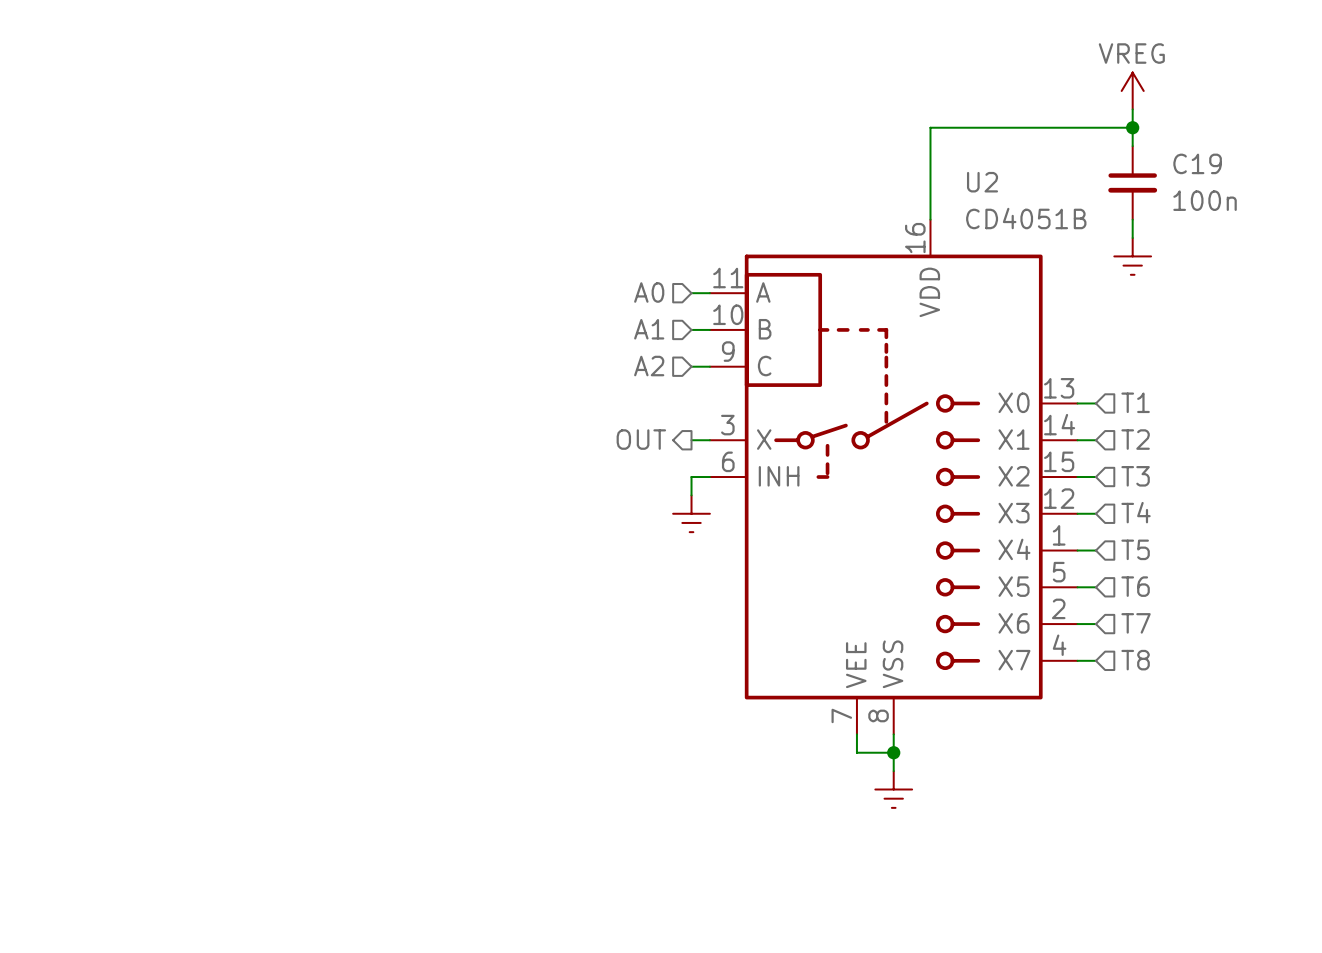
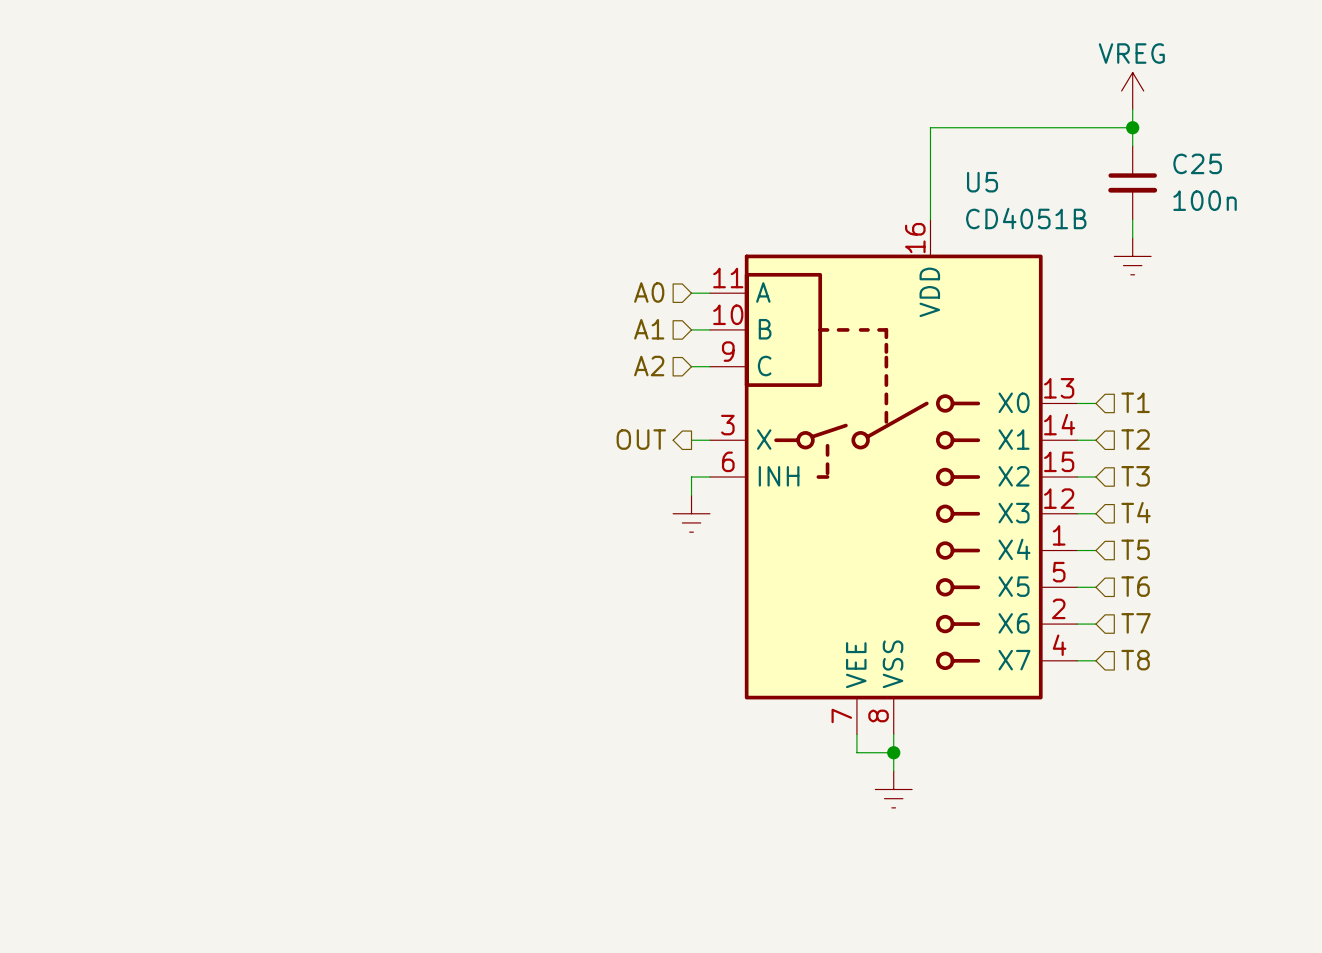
C19 name: C19 (1197, 163) -> C25 (1197, 163)
U2 name: U2 (982, 182) -> U5 (982, 182)

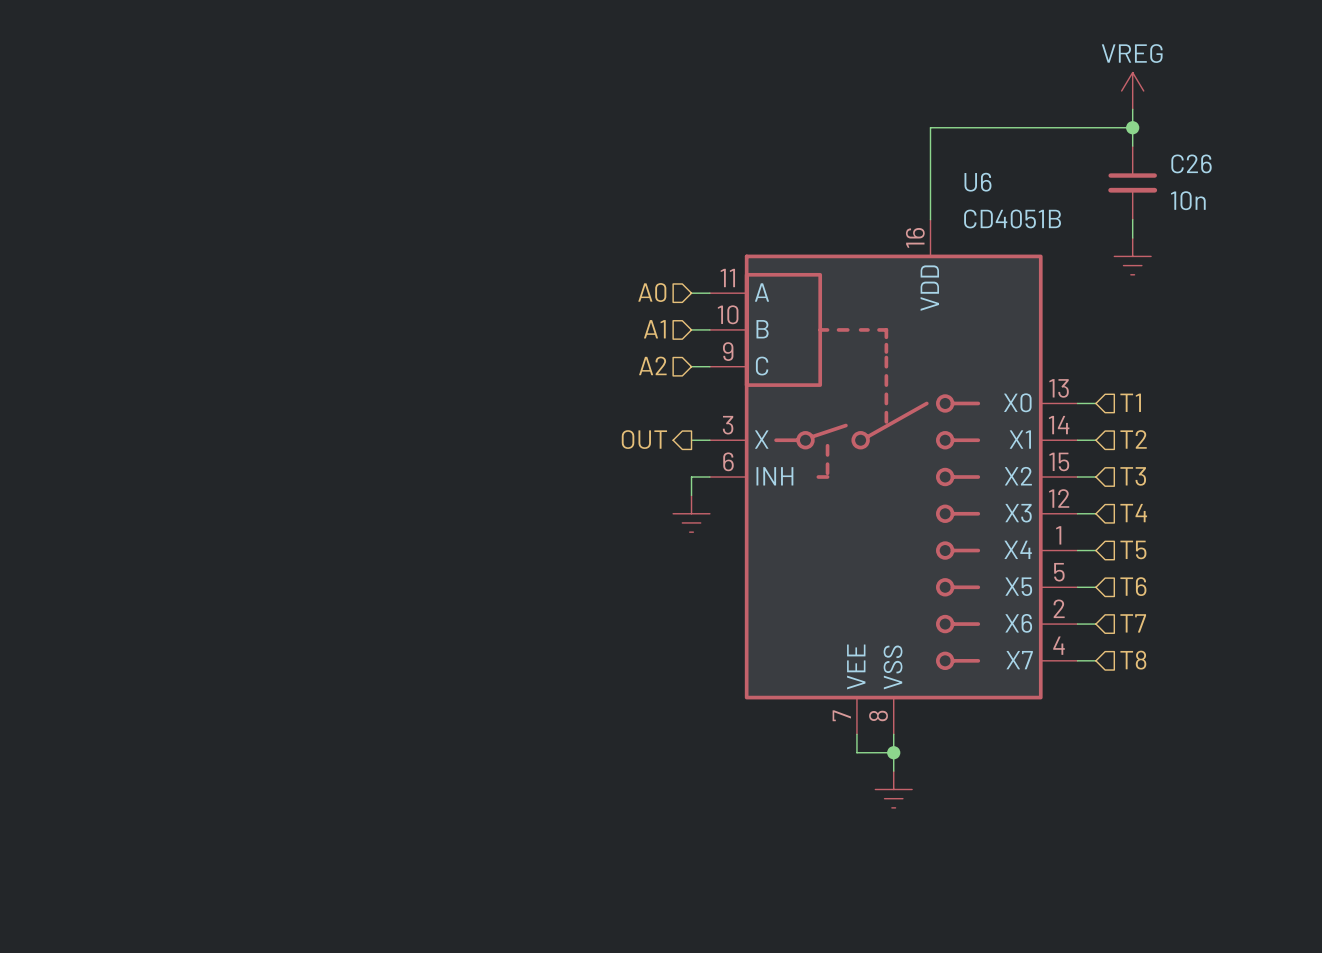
C25 name: C25 (1197, 163) -> C26 (1191, 163)
U5 name: U5 (982, 182) -> U6 (977, 182)
C25 value: 100n (1205, 200) -> 10n (1188, 200)

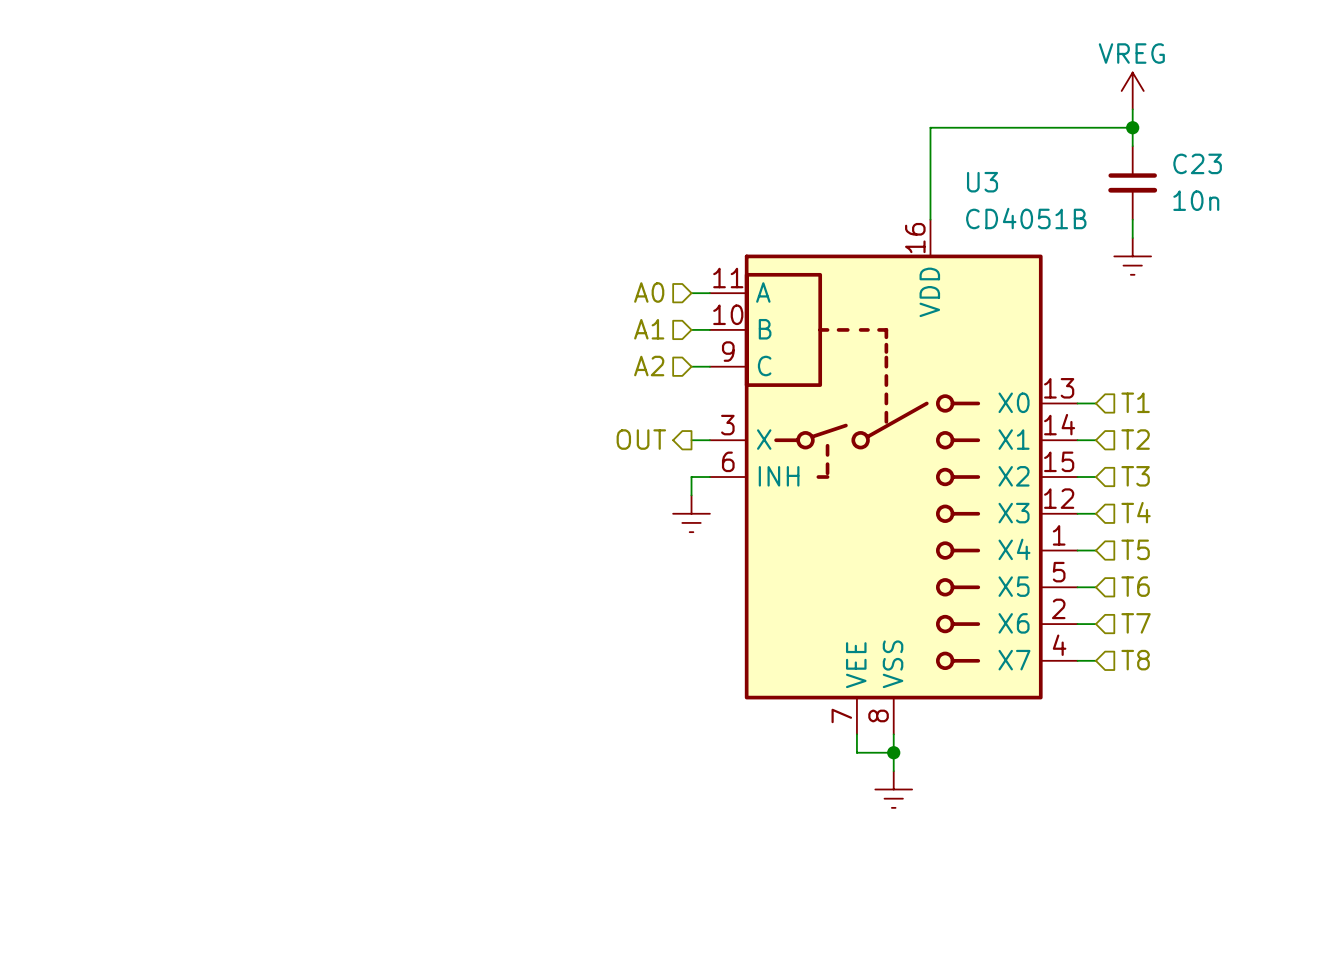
C26 name: C26 (1191, 163) -> C23 (1197, 163)
U6 name: U6 (977, 182) -> U3 (982, 182)

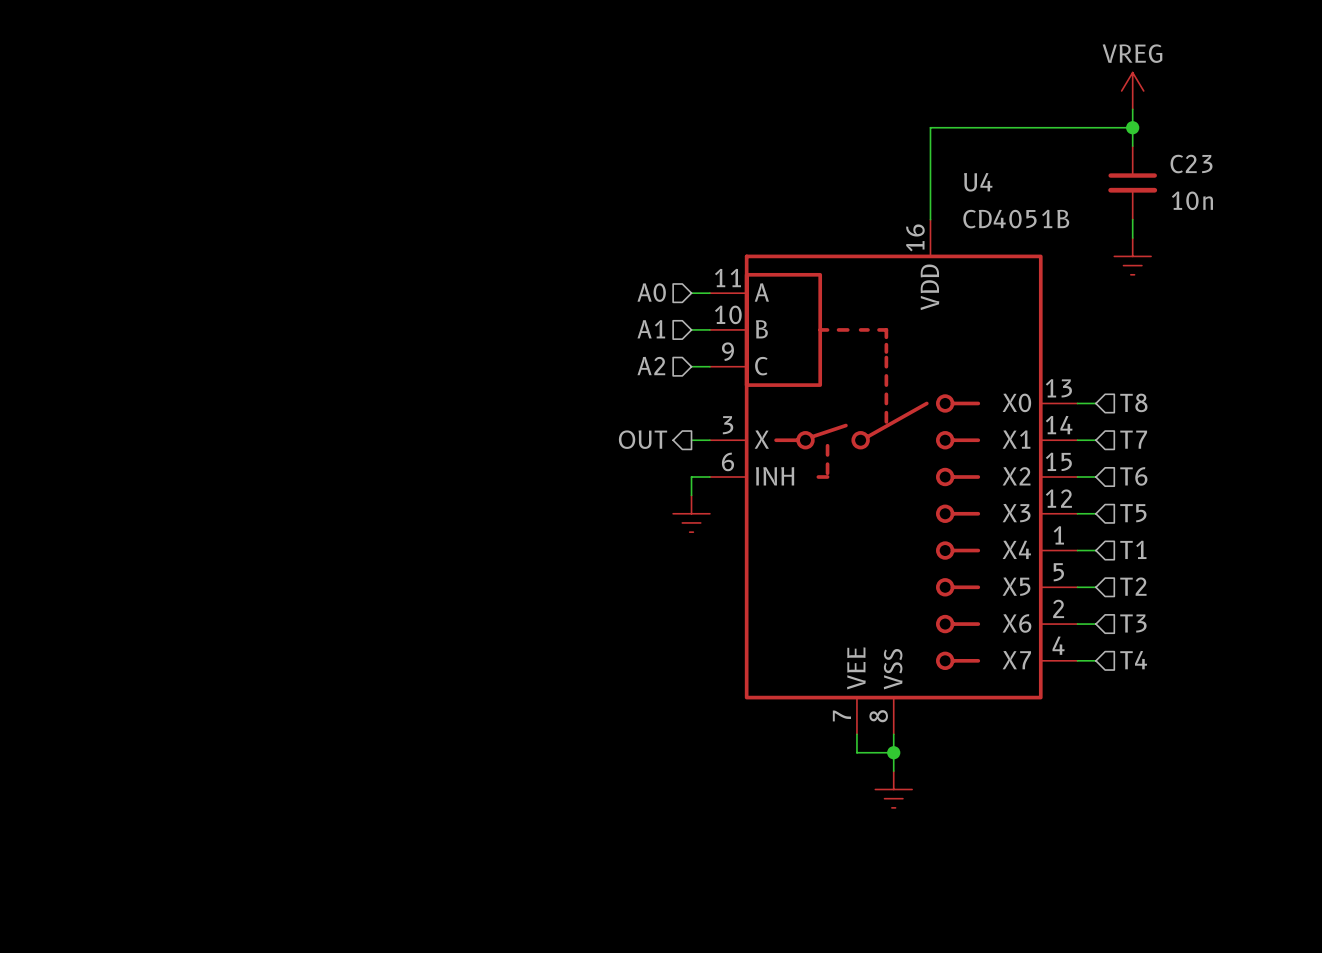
U3 name: U3 (982, 182) -> U4 (978, 182)
hierarchical label: T1 (1135, 402) -> T8 (1133, 402)
hierarchical label: T2 (1135, 439) -> T7 (1133, 439)
hierarchical label: T3 (1135, 476) -> T6 (1133, 476)
hierarchical label: T4 (1136, 512) -> T5 (1133, 513)
hierarchical label: T5 (1135, 549) -> T1 (1133, 549)
hierarchical label: T6 (1135, 586) -> T2 (1133, 586)
hierarchical label: T7 (1136, 623) -> T3 (1133, 623)
hierarchical label: T8 (1135, 660) -> T4 (1133, 660)

